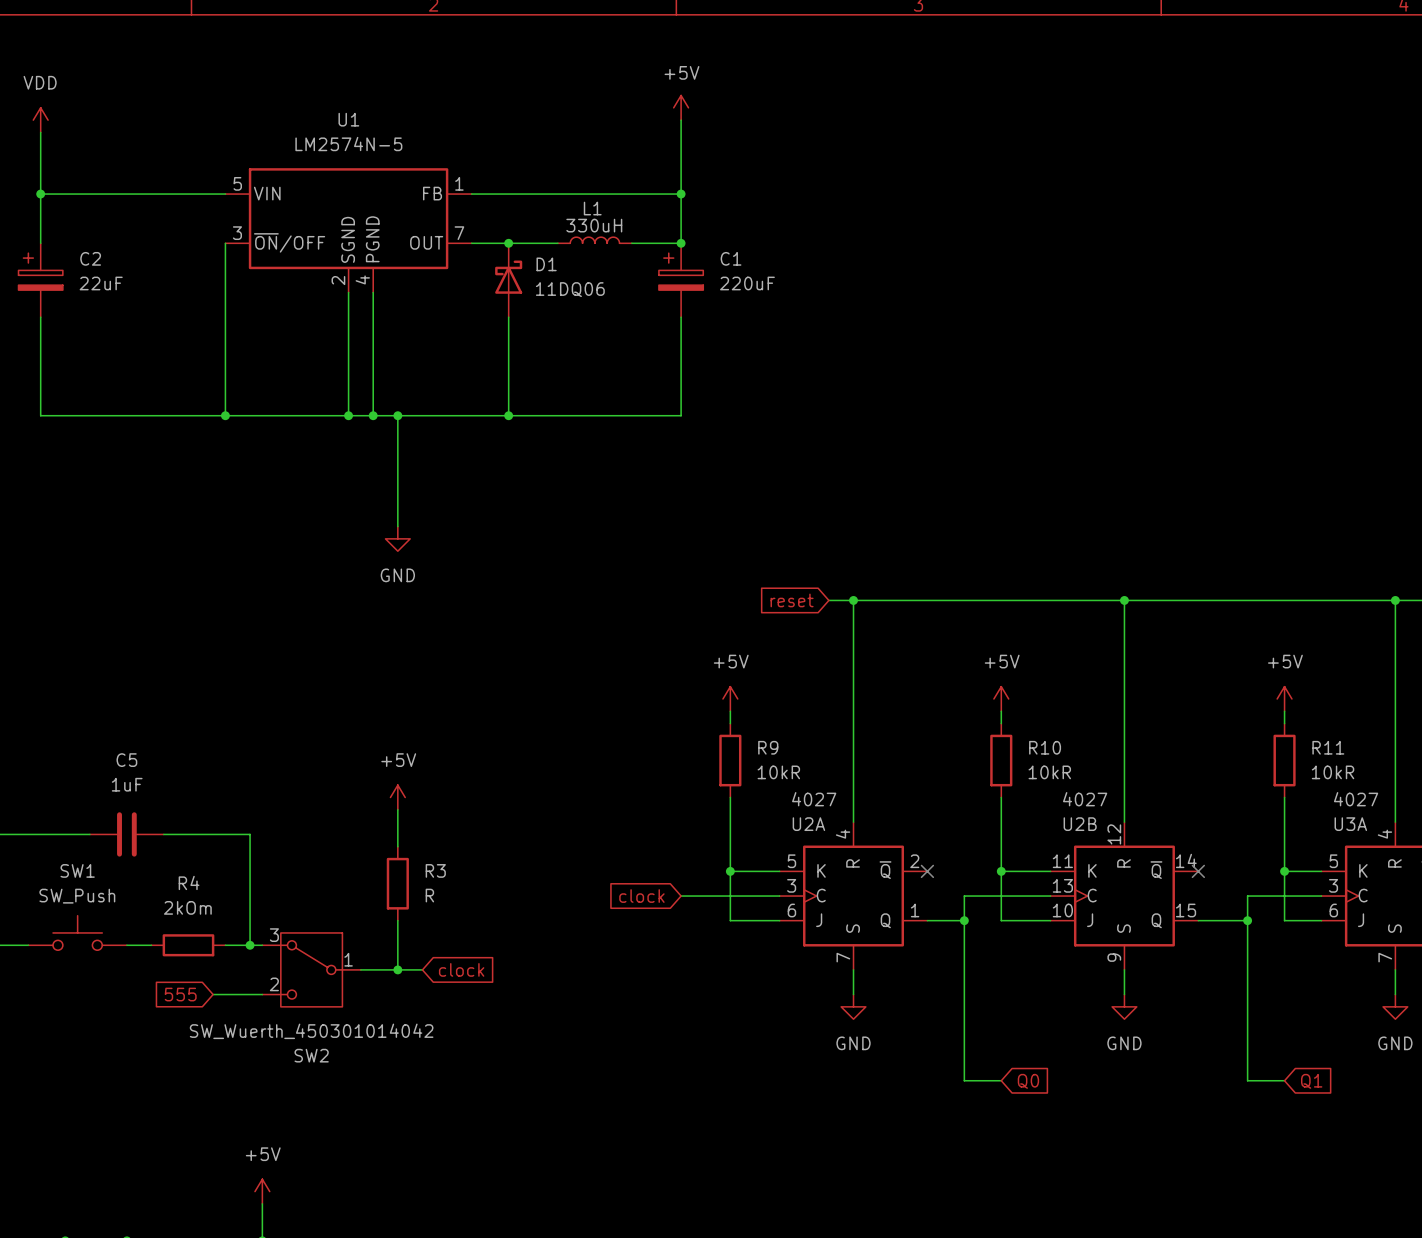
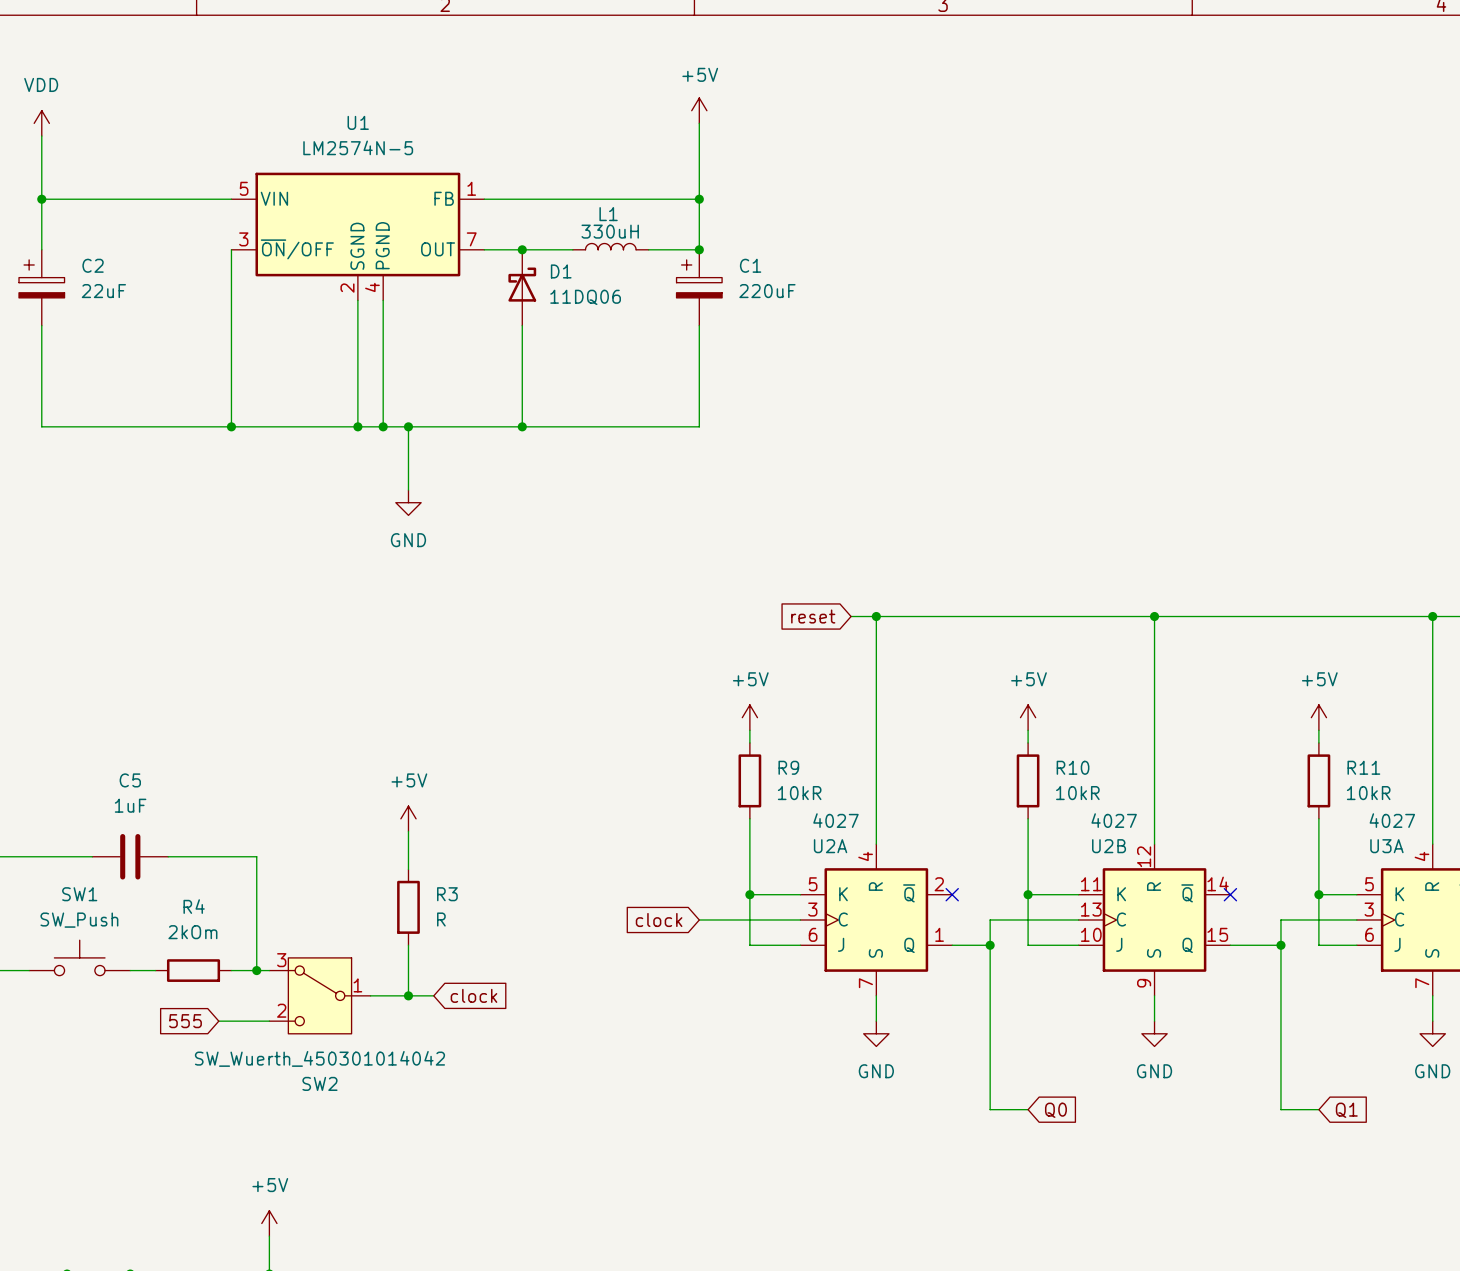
wire: (397, 477) (397, 526) -> none
power symbol position: GND (397, 538) -> GND (408, 502)

